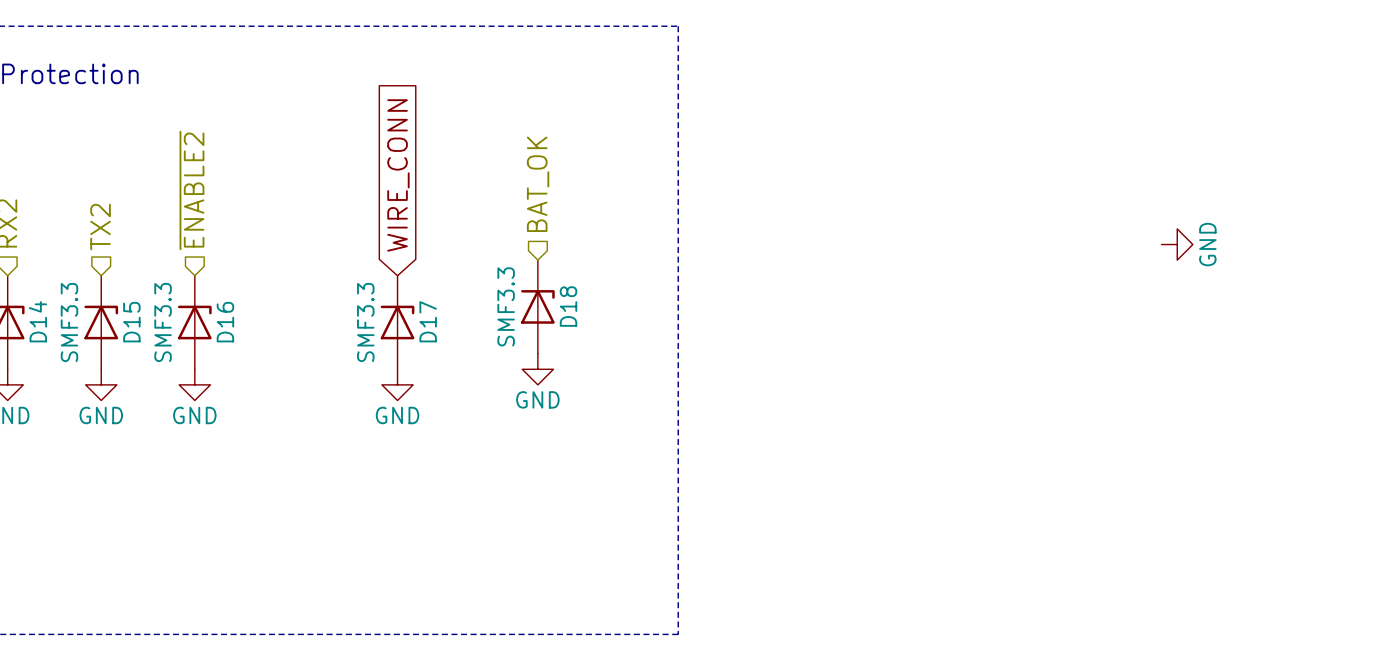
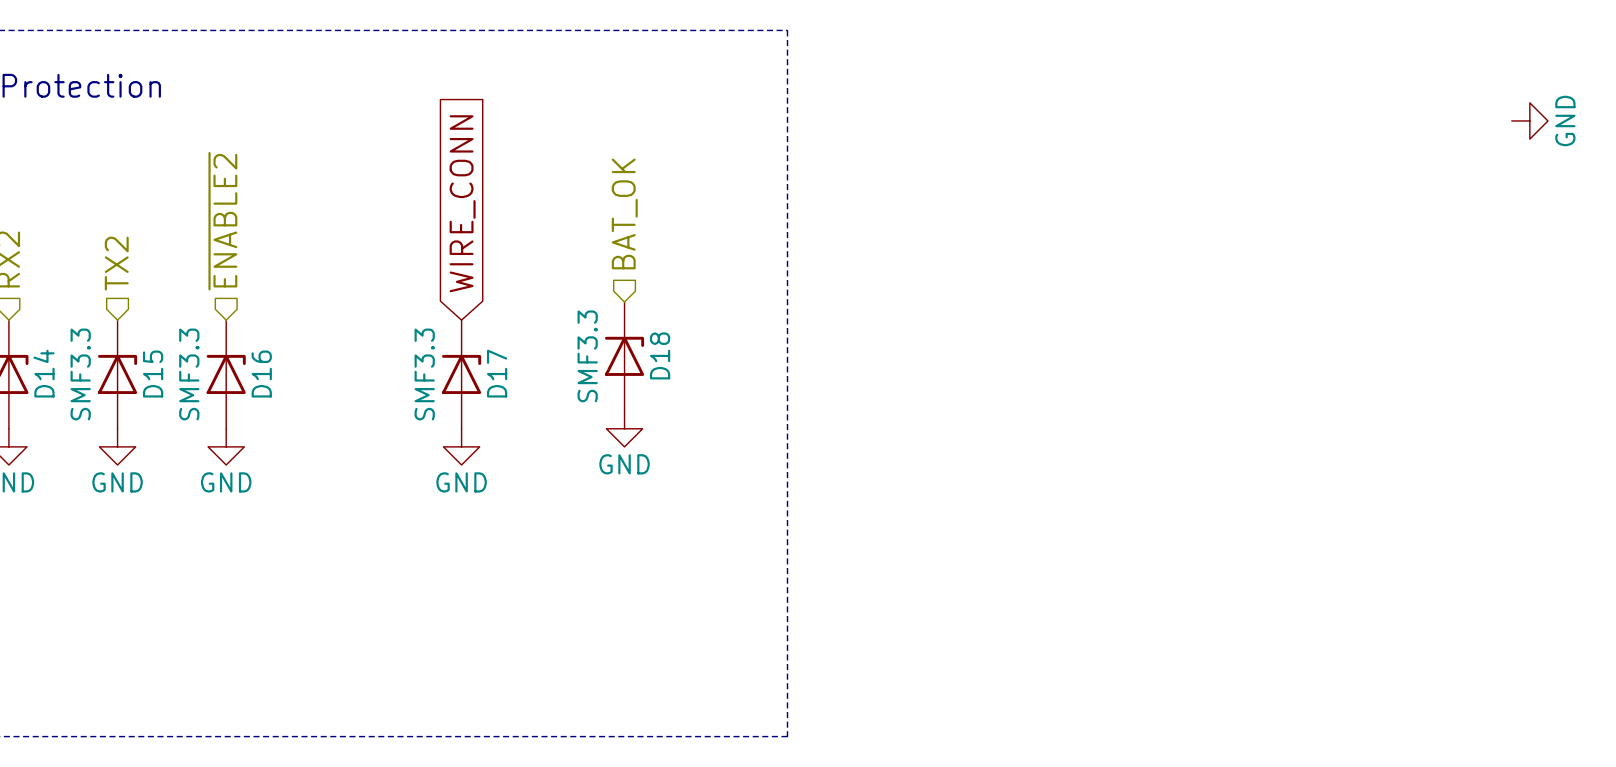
power symbol position: GND (1177, 244) -> GND (1529, 120)

